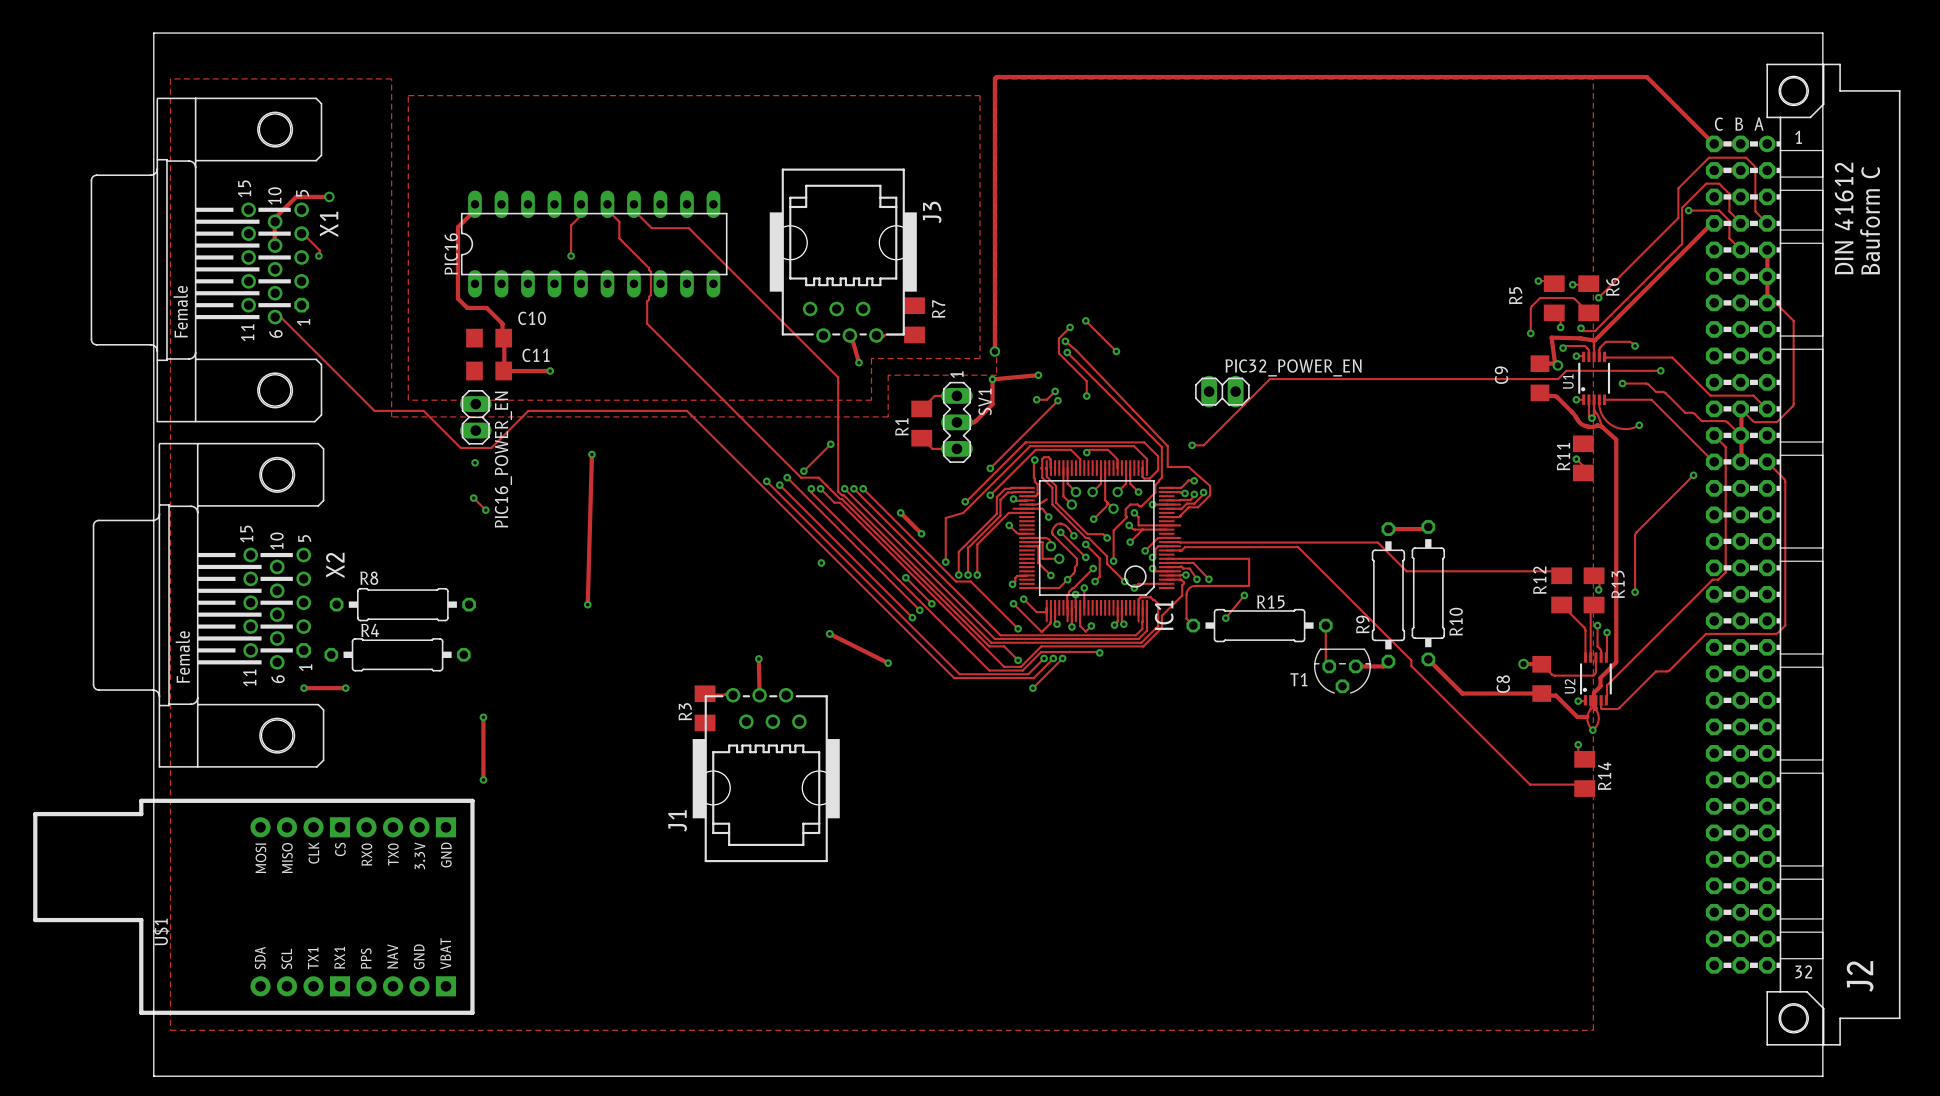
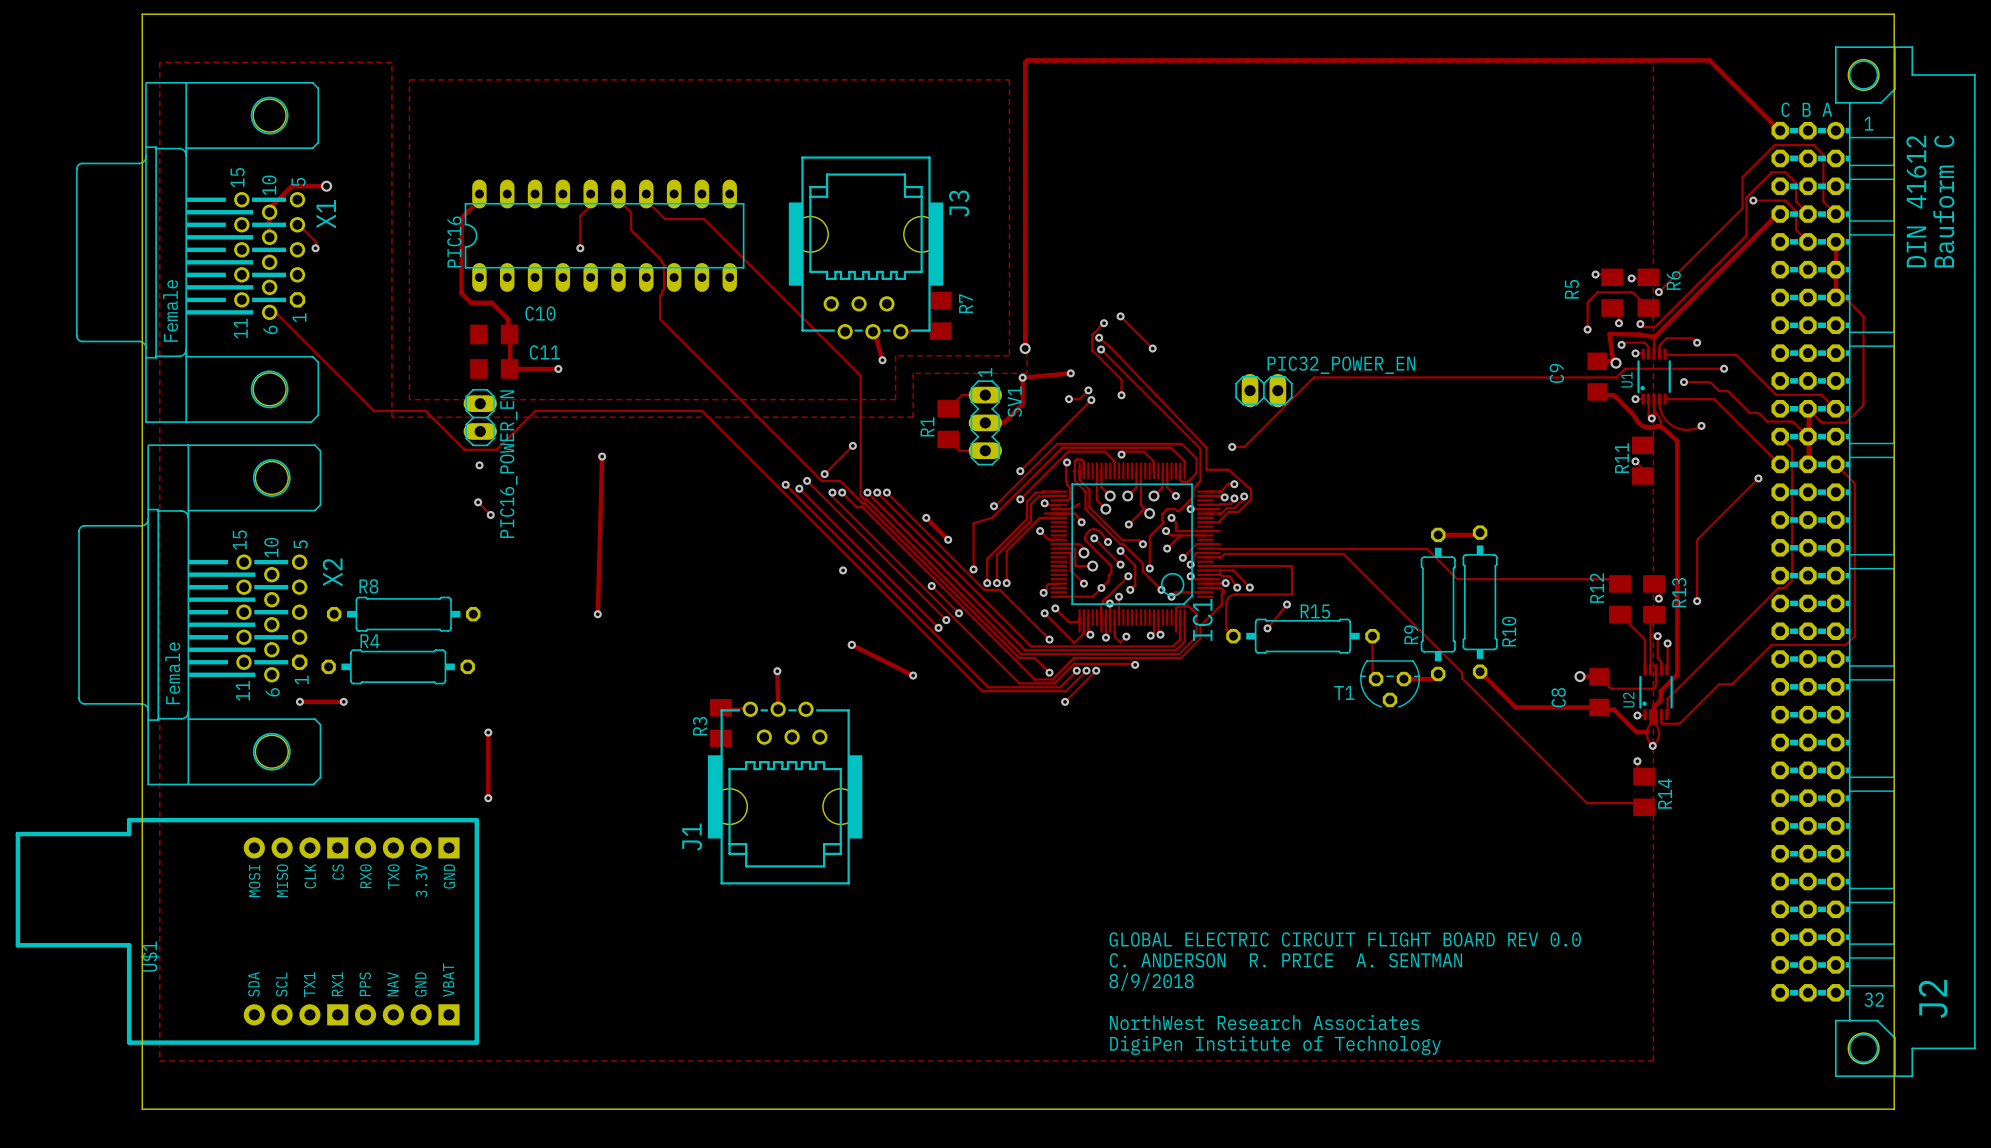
text: none -> GLOBAL ELECTRIC CIRCUIT FLIGHT BOARD REV 0.0 (1345, 939)
text: none -> C. ANDERSON R. PRICE A. SENTMAN (1285, 960)
text: none -> 8/9/2018 (1151, 981)
text: none -> NorthWest Research Associates (1264, 1022)
text: none -> DigiPen Institute of Technology (1275, 1045)

